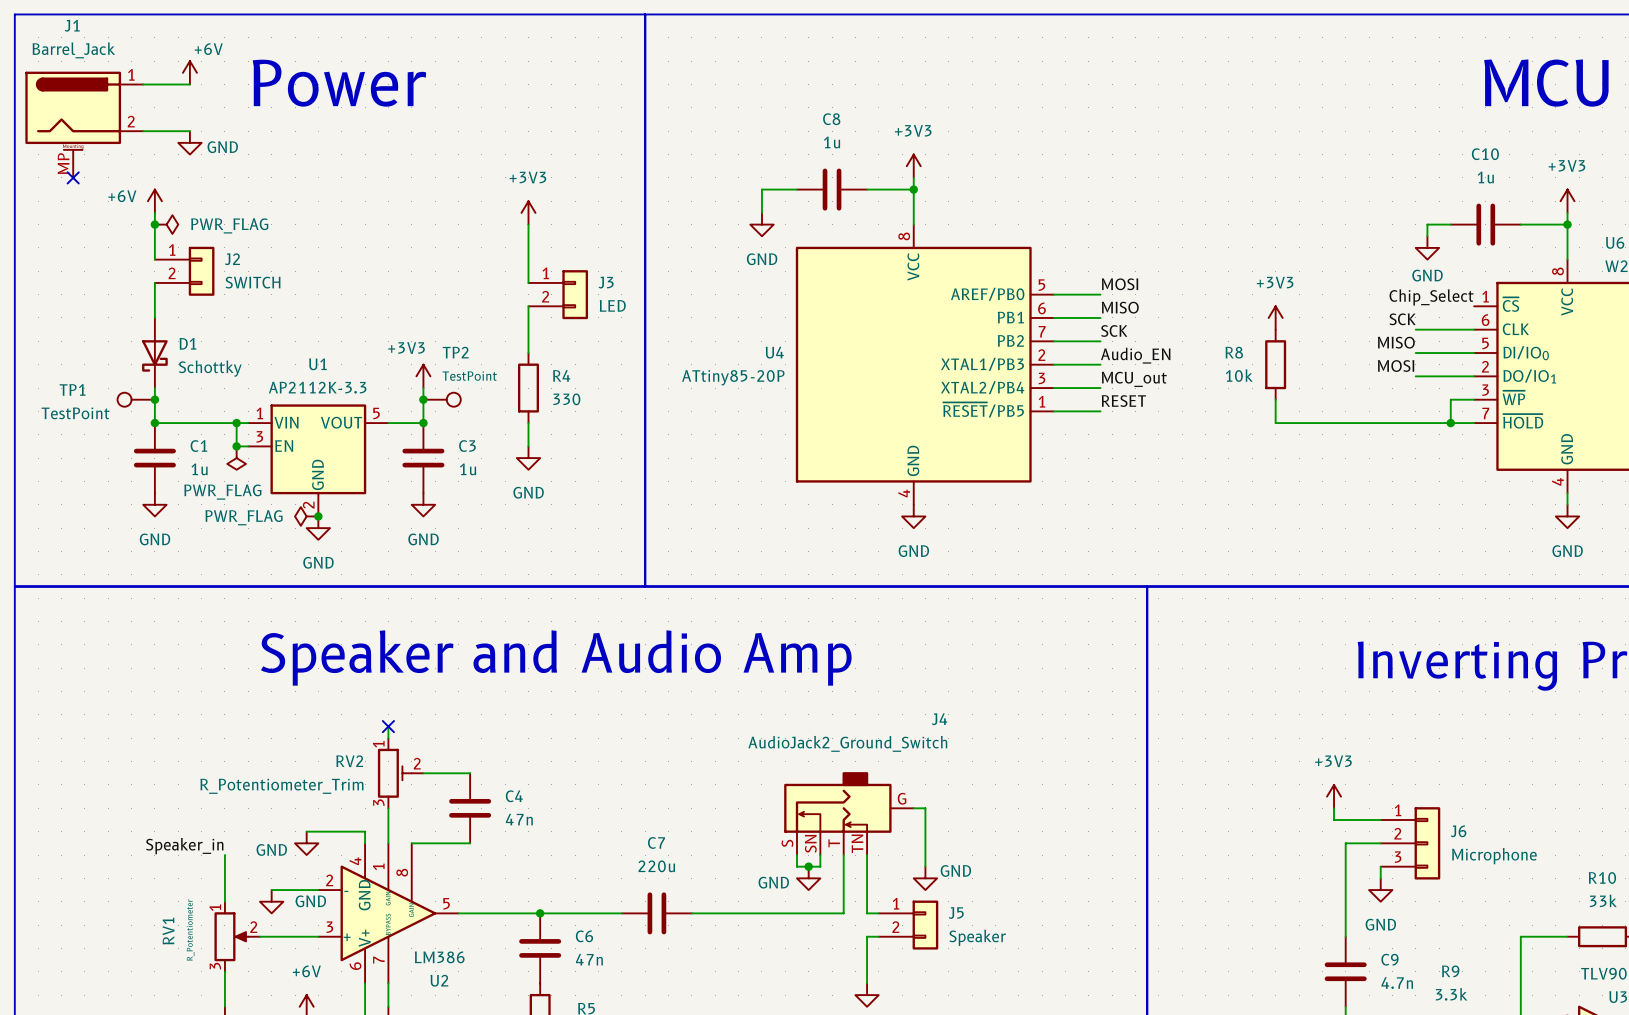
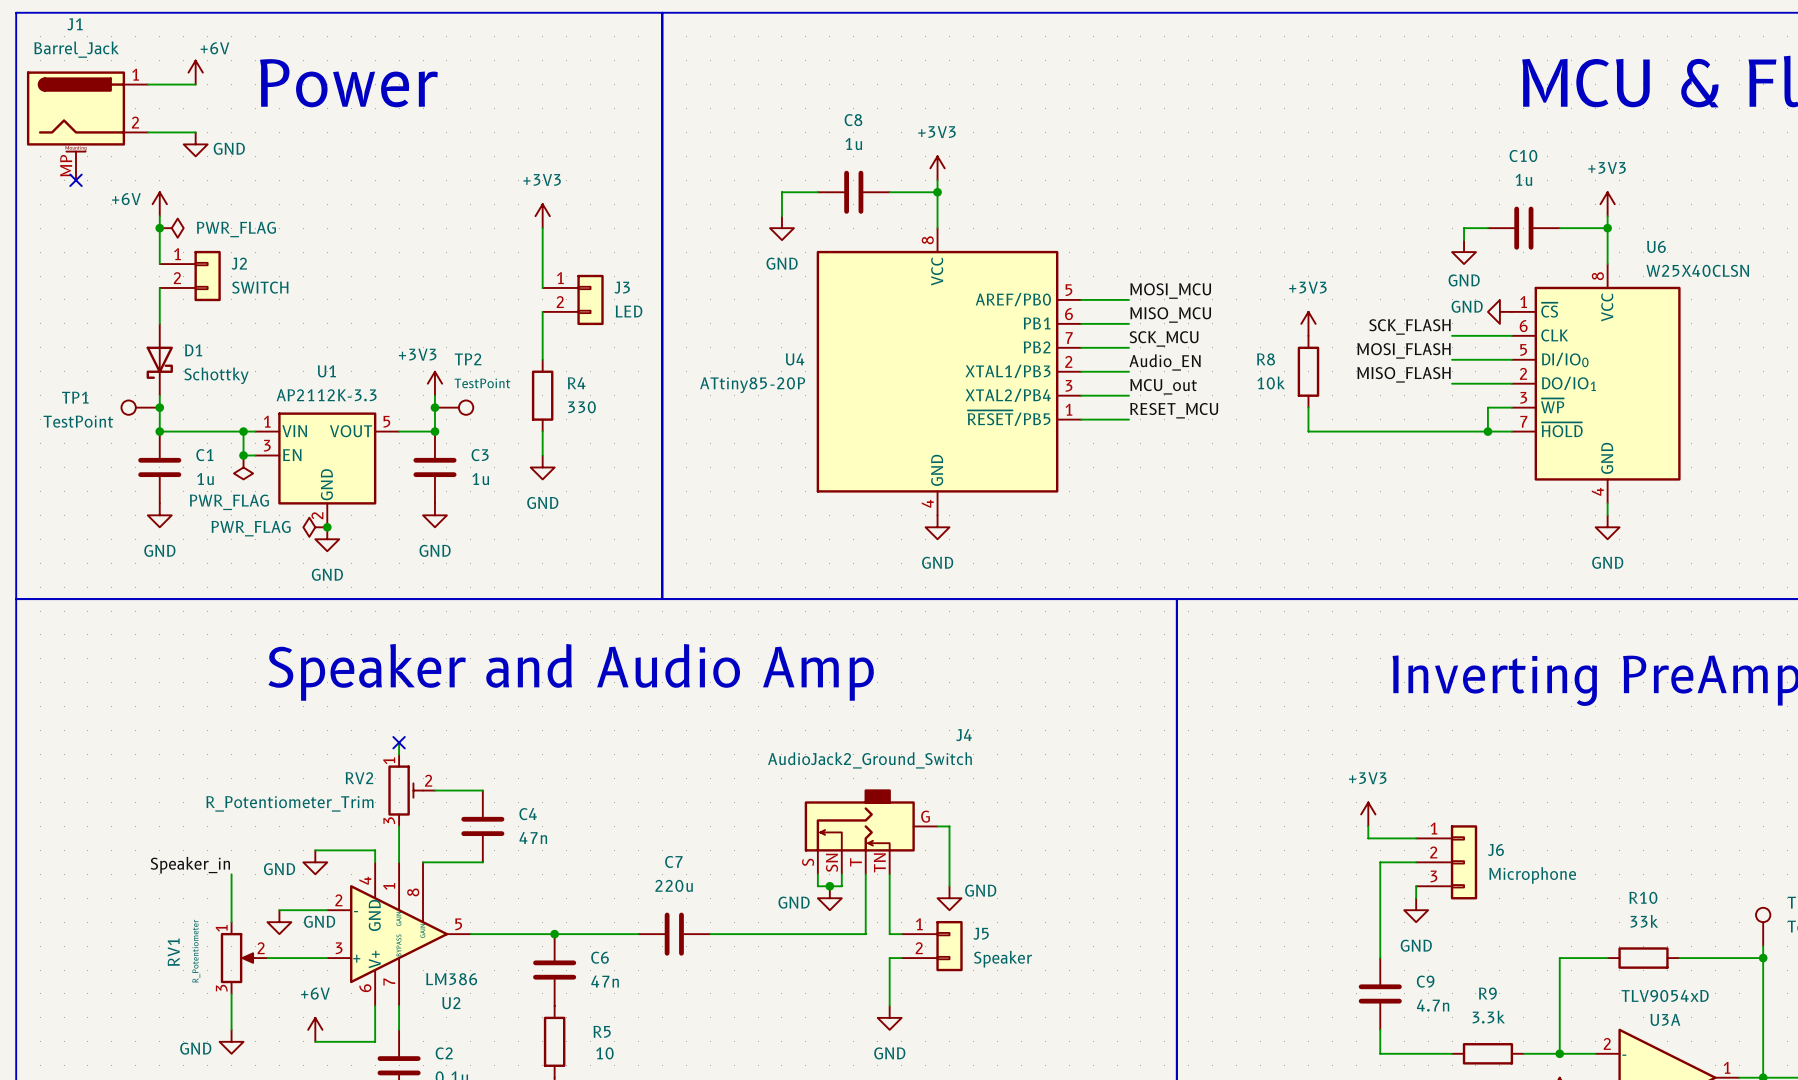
label: MOSI (1120, 284) -> MOSI_MCU (1170, 291)
label: Chip_Select (1431, 297) -> none
power symbol: none -> GND (1499, 311)
label: MISO (1120, 307) -> MISO_MCU (1170, 314)
label: SCK (1402, 319) -> SCK_FLASH (1409, 326)
label: SCK (1114, 330) -> SCK_MCU (1164, 338)
label: MISO (1396, 342) -> MOSI_FLASH (1404, 350)
label: MOSI (1396, 366) -> MISO_FLASH (1404, 374)
label: RESET (1123, 401) -> RESET_MCU (1174, 410)

